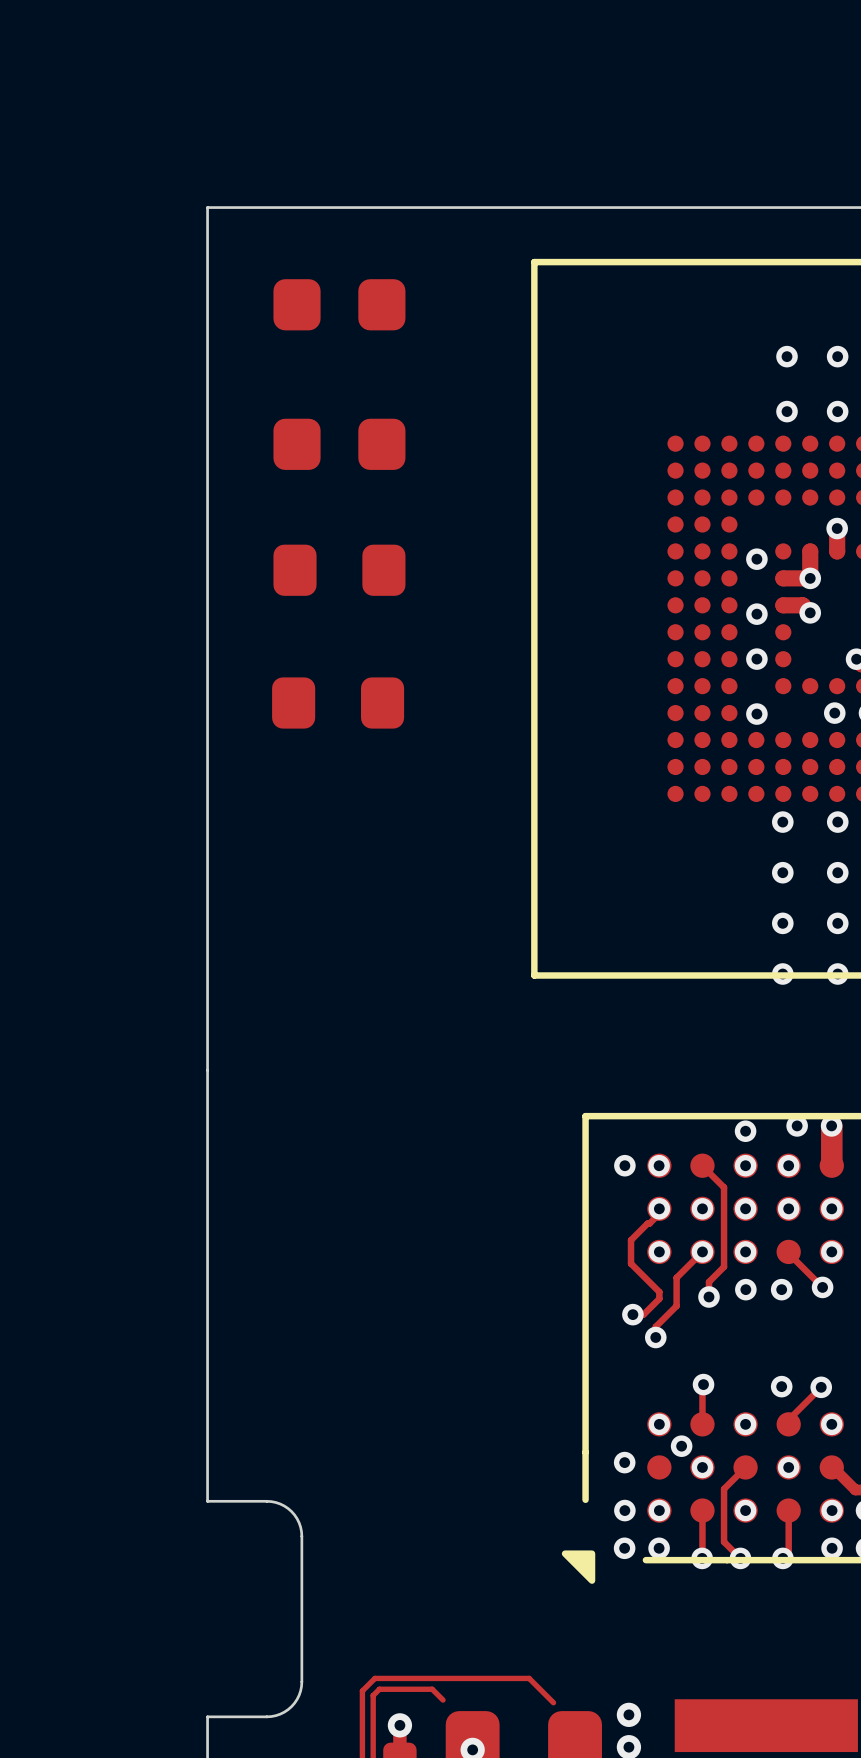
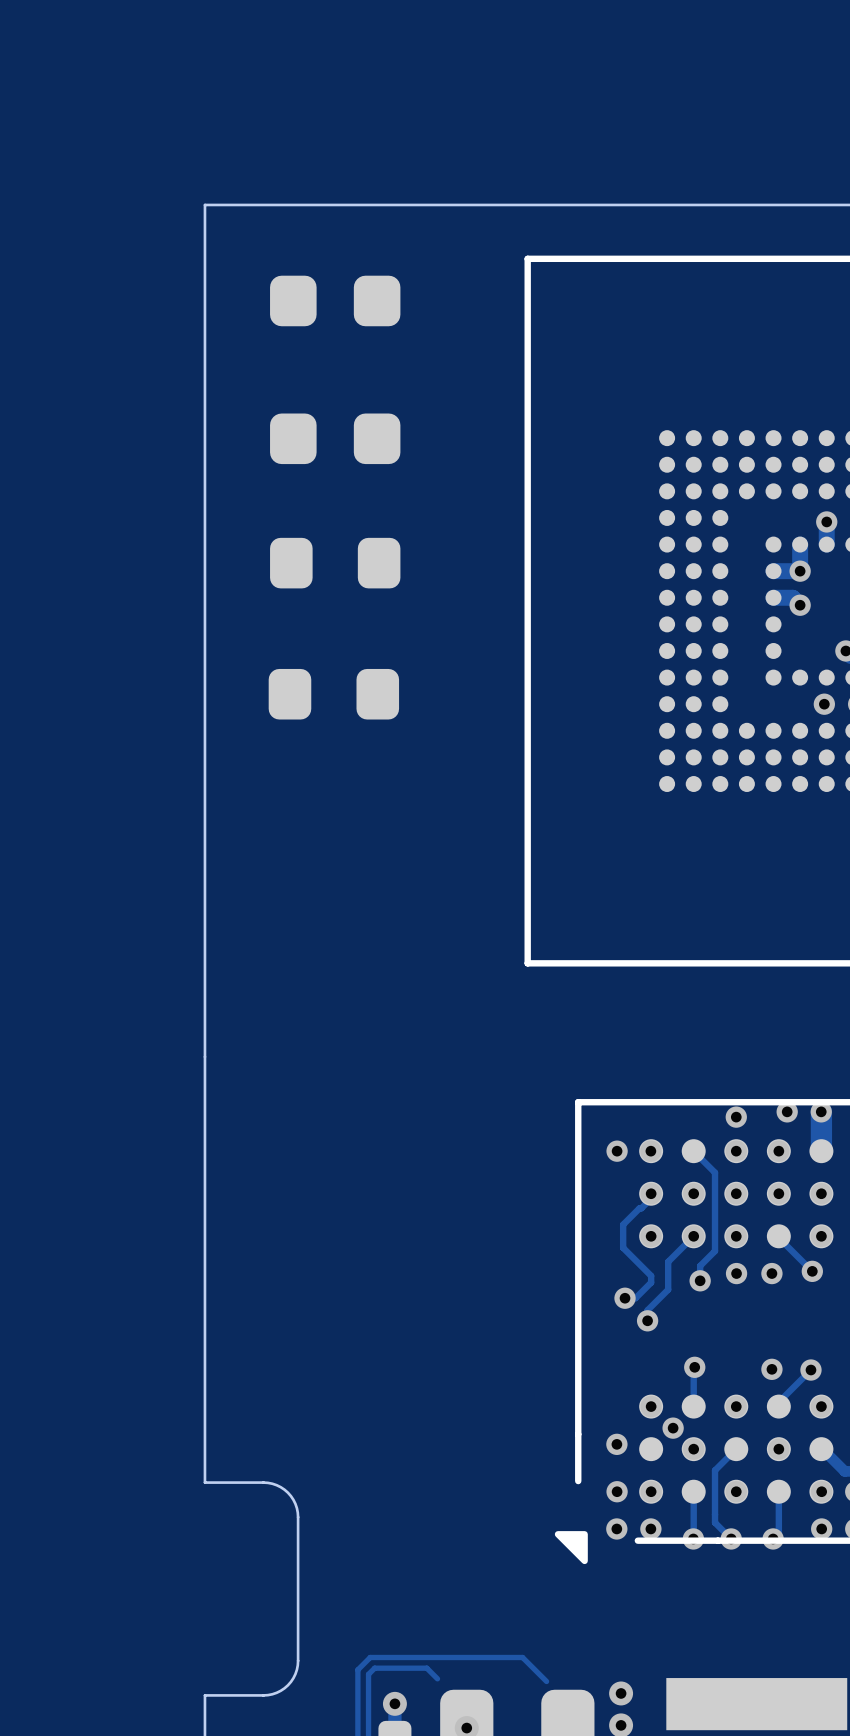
via: (787, 356) -> none
via: (837, 356) -> none
via: (787, 411) -> none
via: (837, 411) -> none
via: (756, 559) -> none
via: (756, 614) -> none
via: (756, 659) -> none
via: (756, 714) -> none
via: (782, 822) -> none
via: (837, 822) -> none
via: (782, 872) -> none
via: (837, 872) -> none
via: (782, 923) -> none
via: (837, 923) -> none
via: (782, 973) -> none
via: (837, 973) -> none

